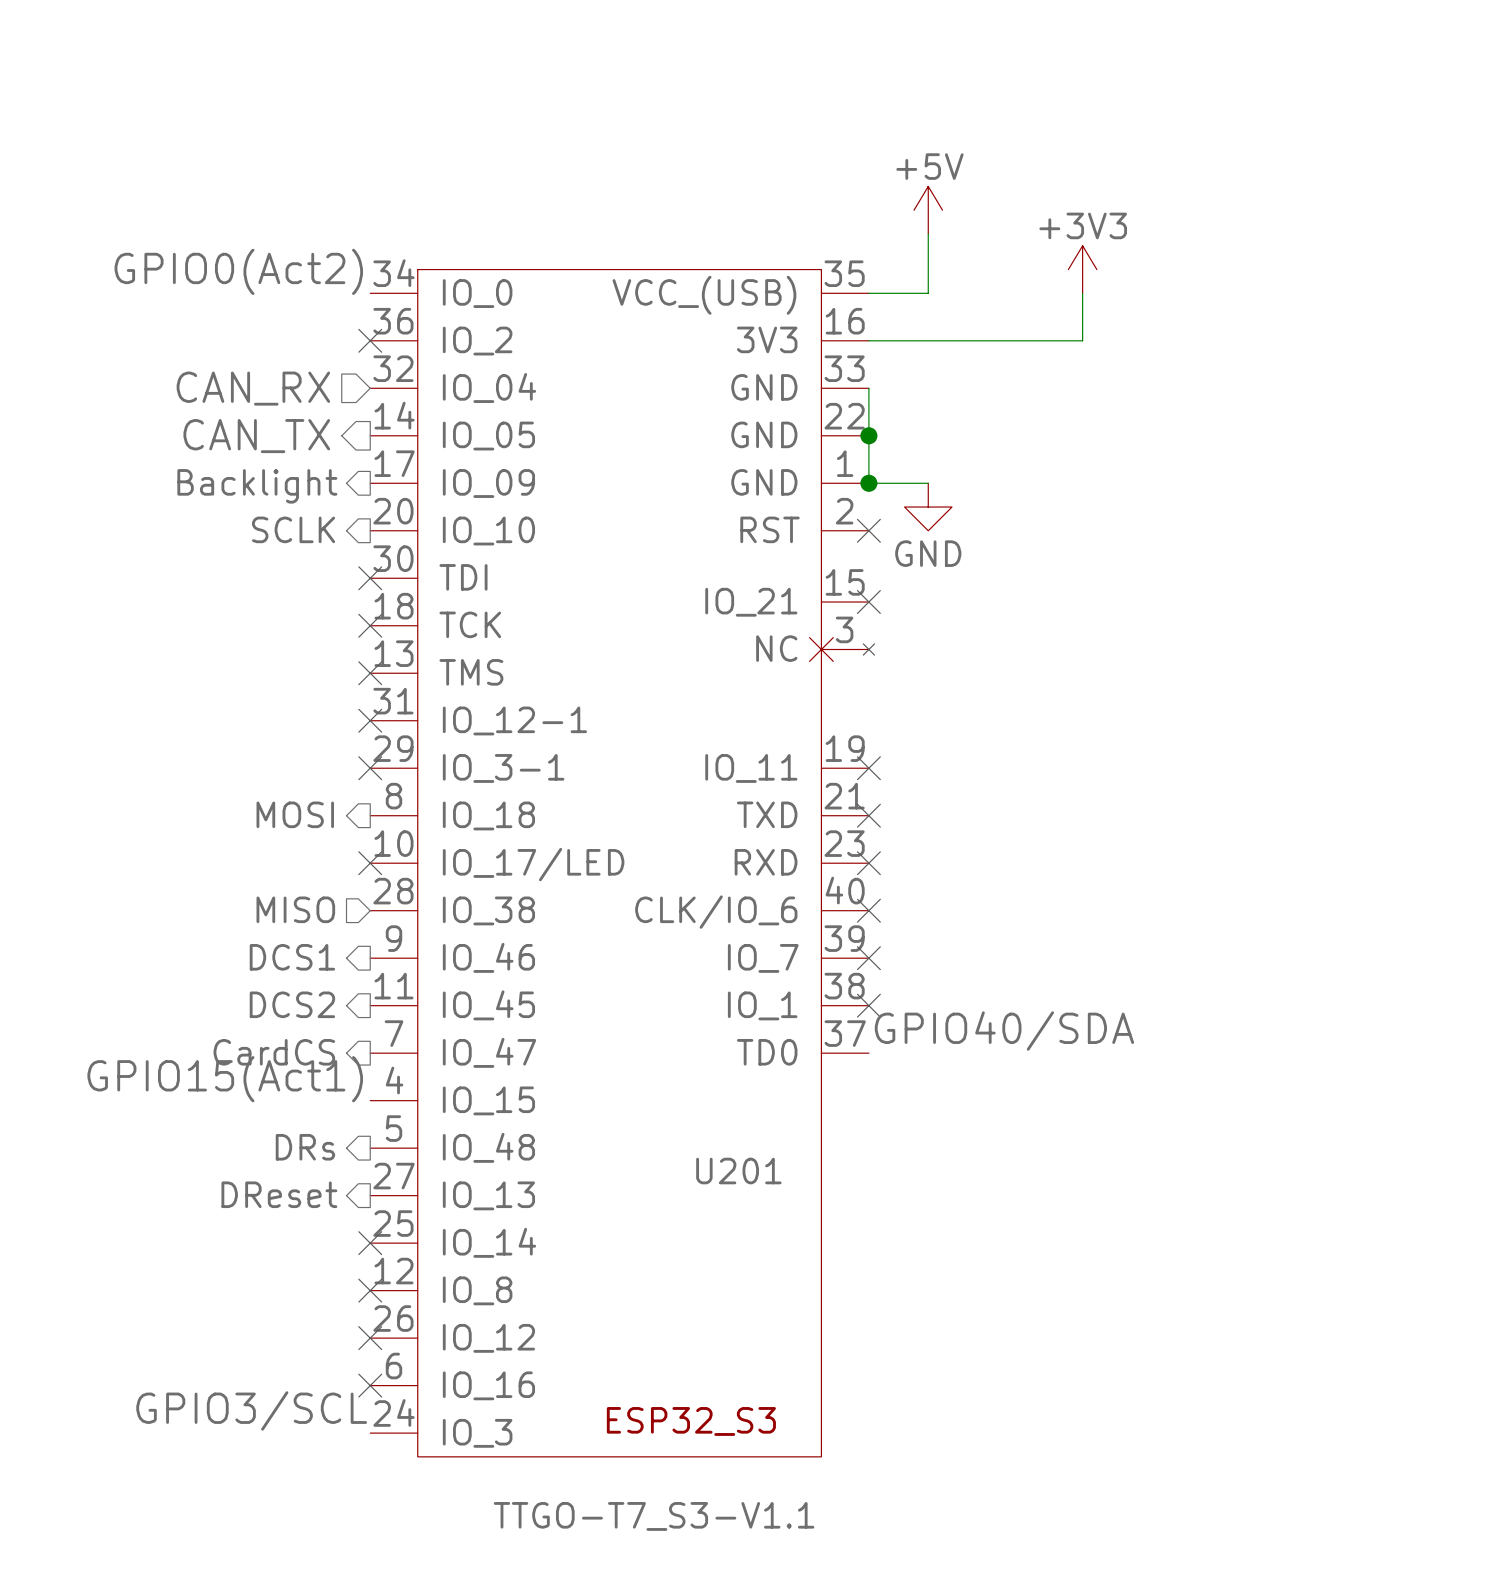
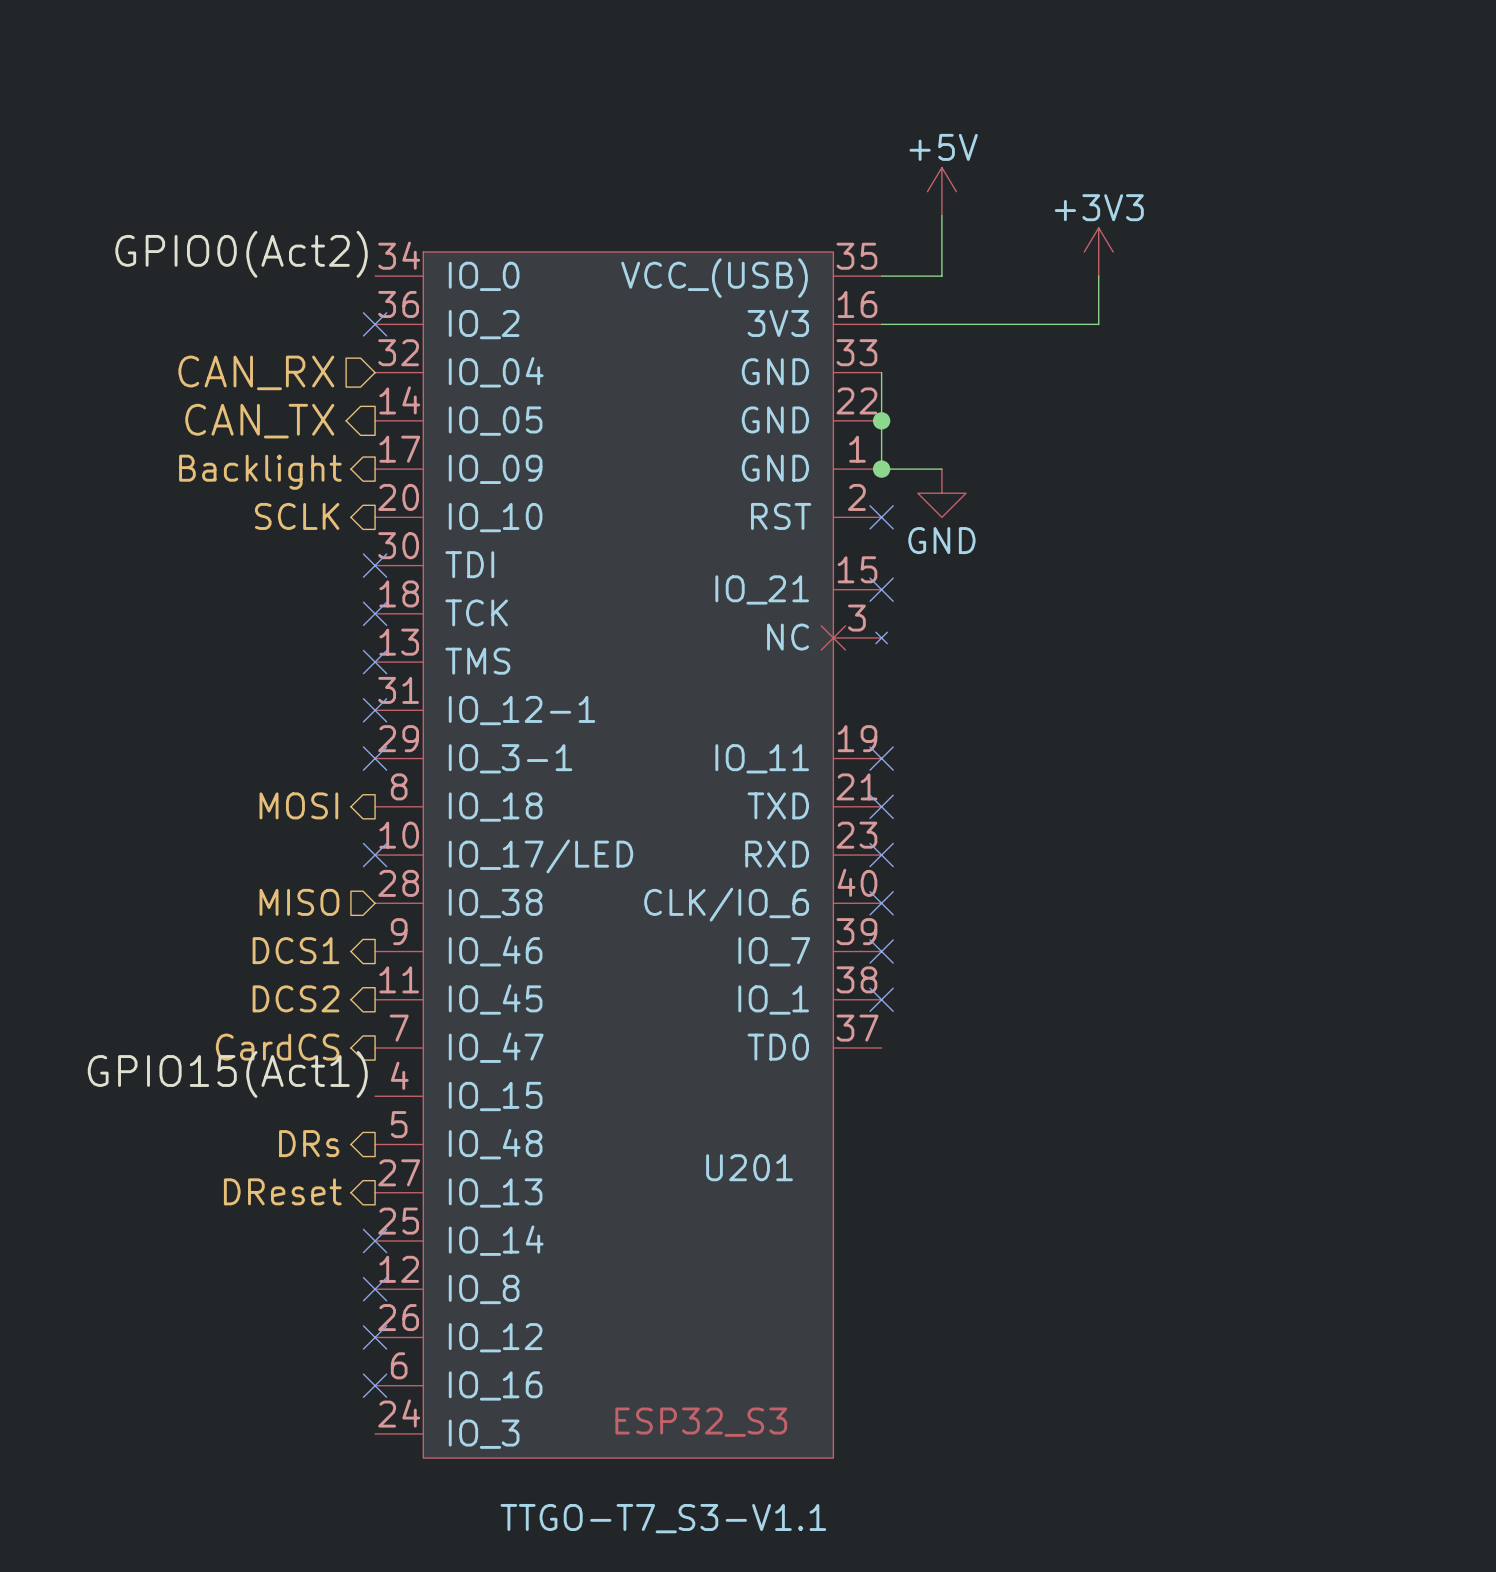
label: GPIO40/SDA (1004, 1031) -> none
label: GPIO3/SCL (251, 1410) -> none

